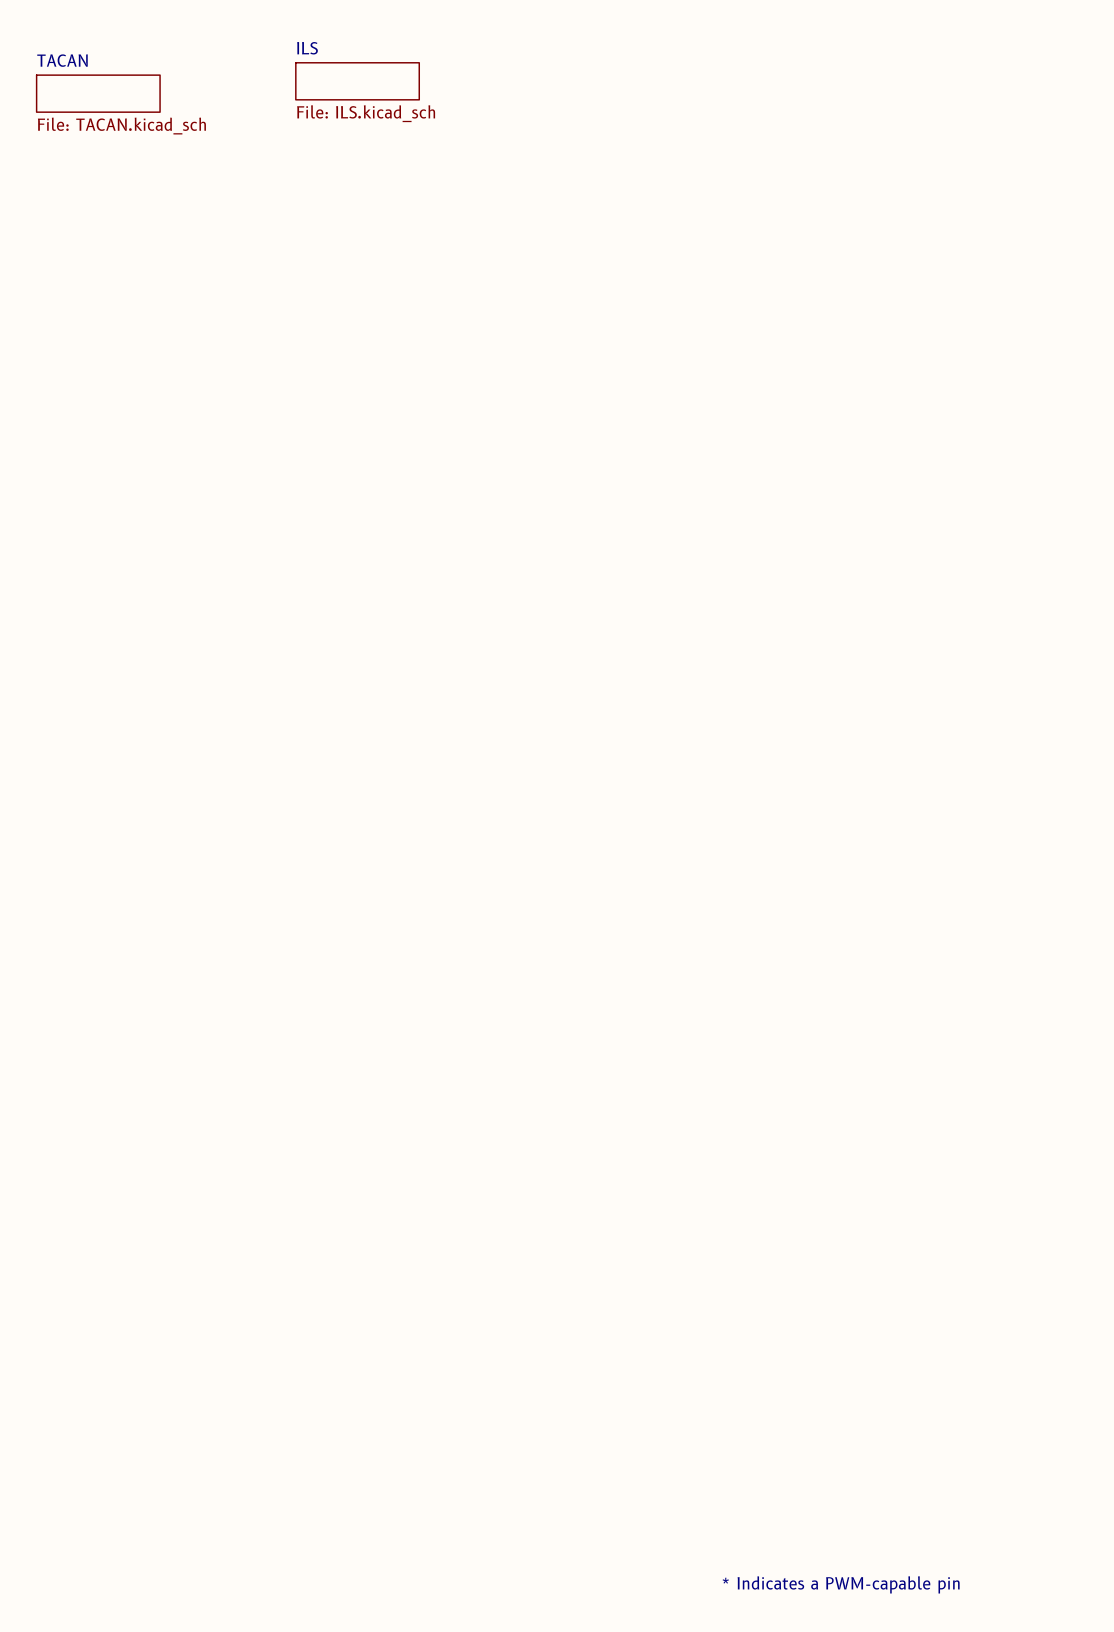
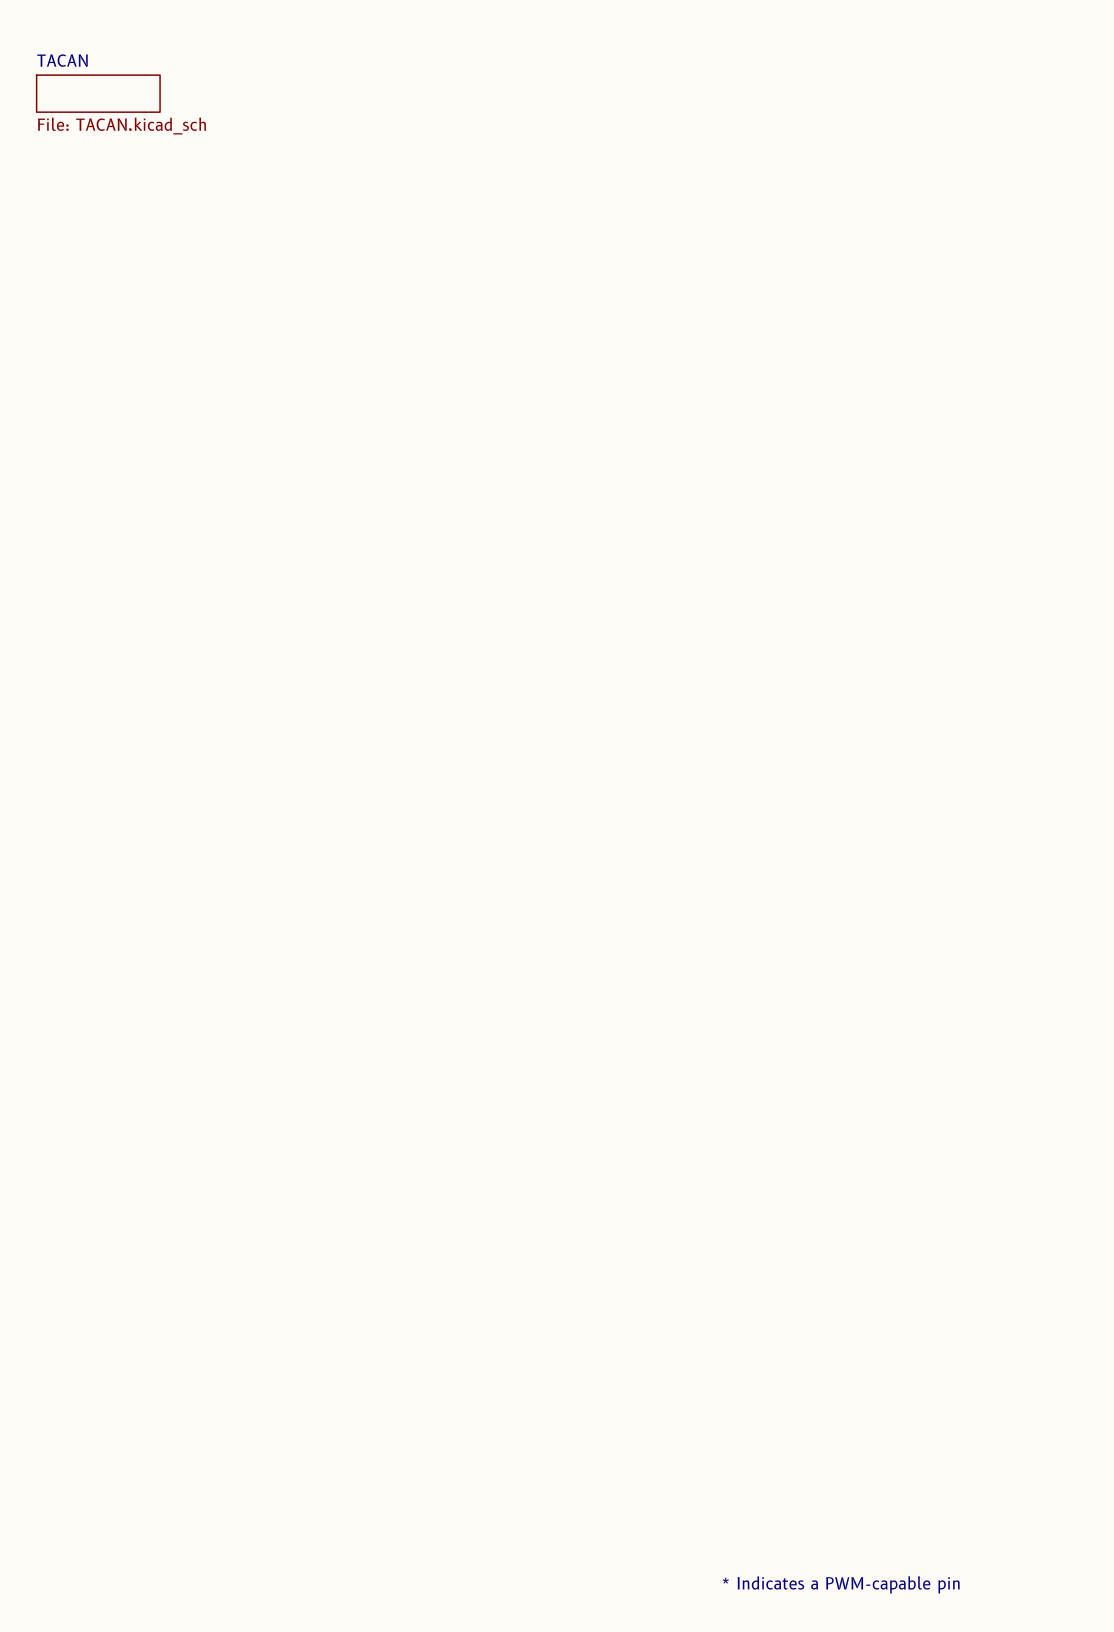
sheet ILS: File: ILS.kicad_sch (357, 81) -> none

